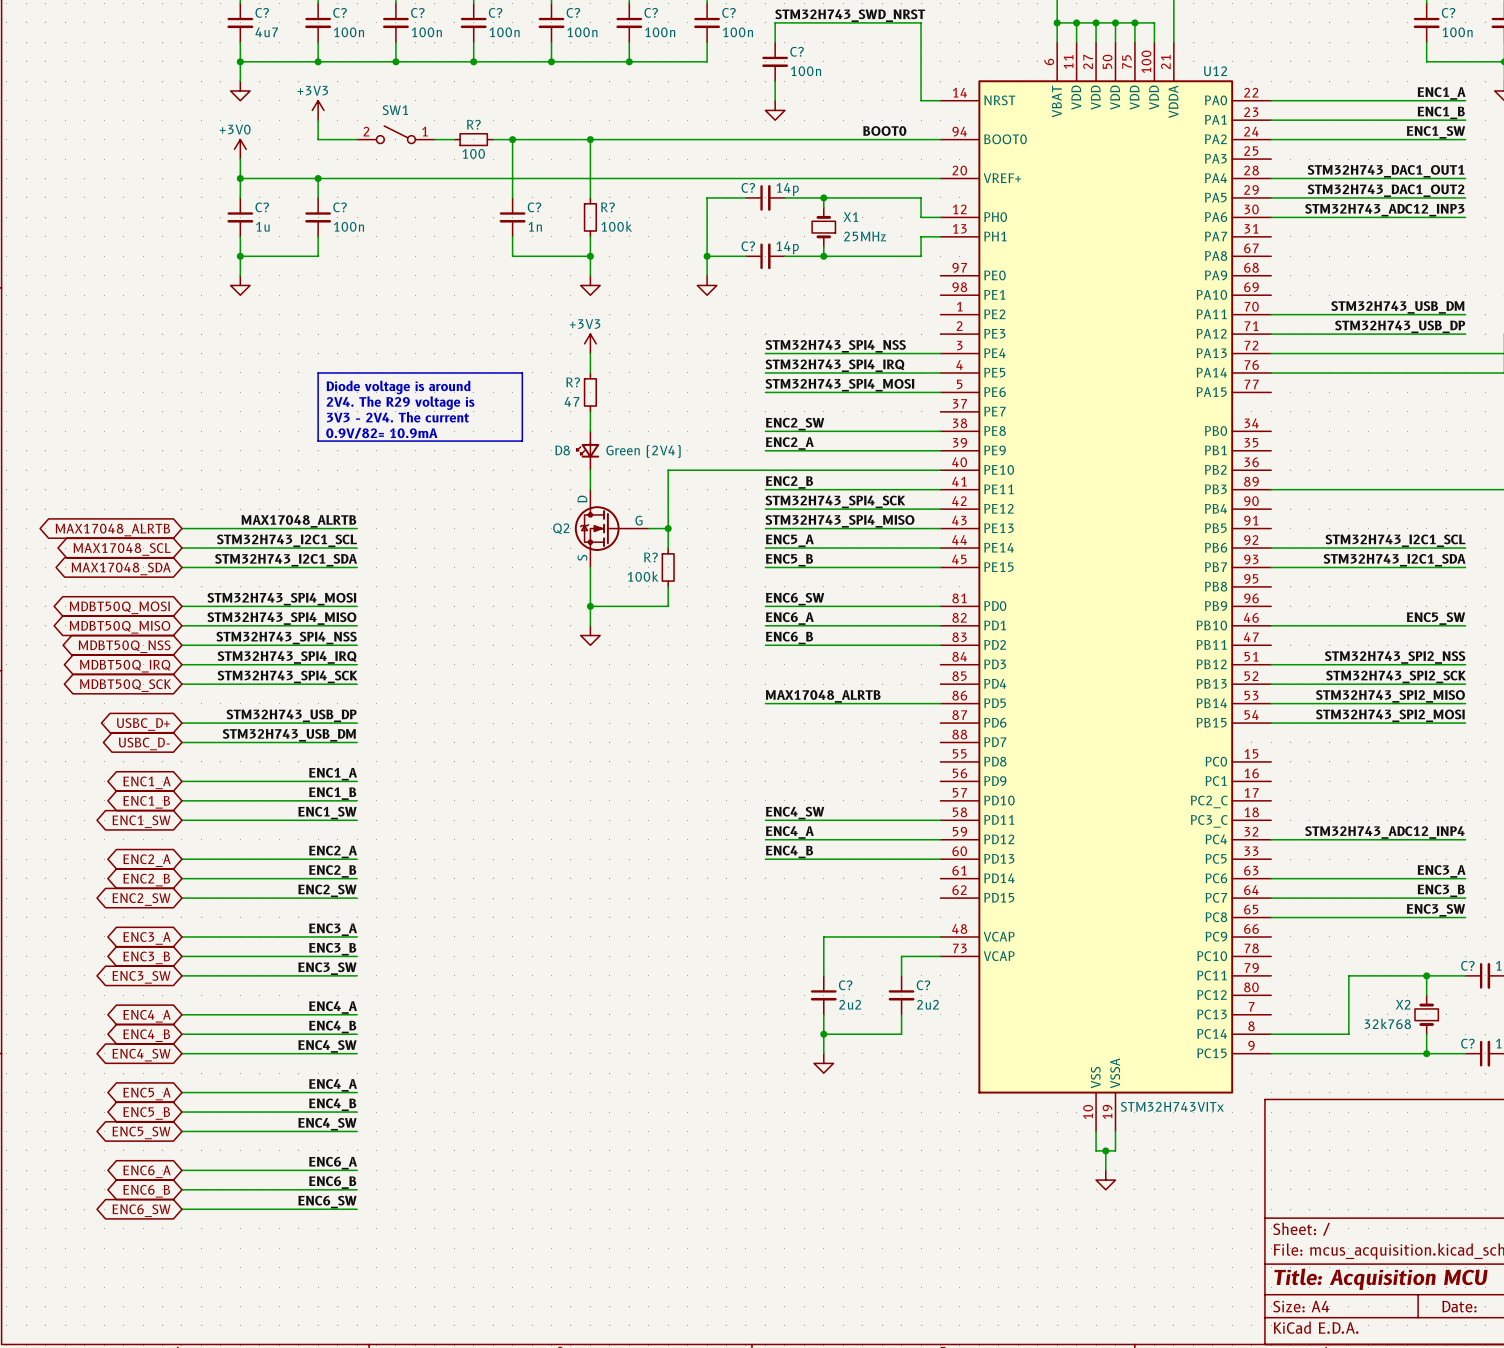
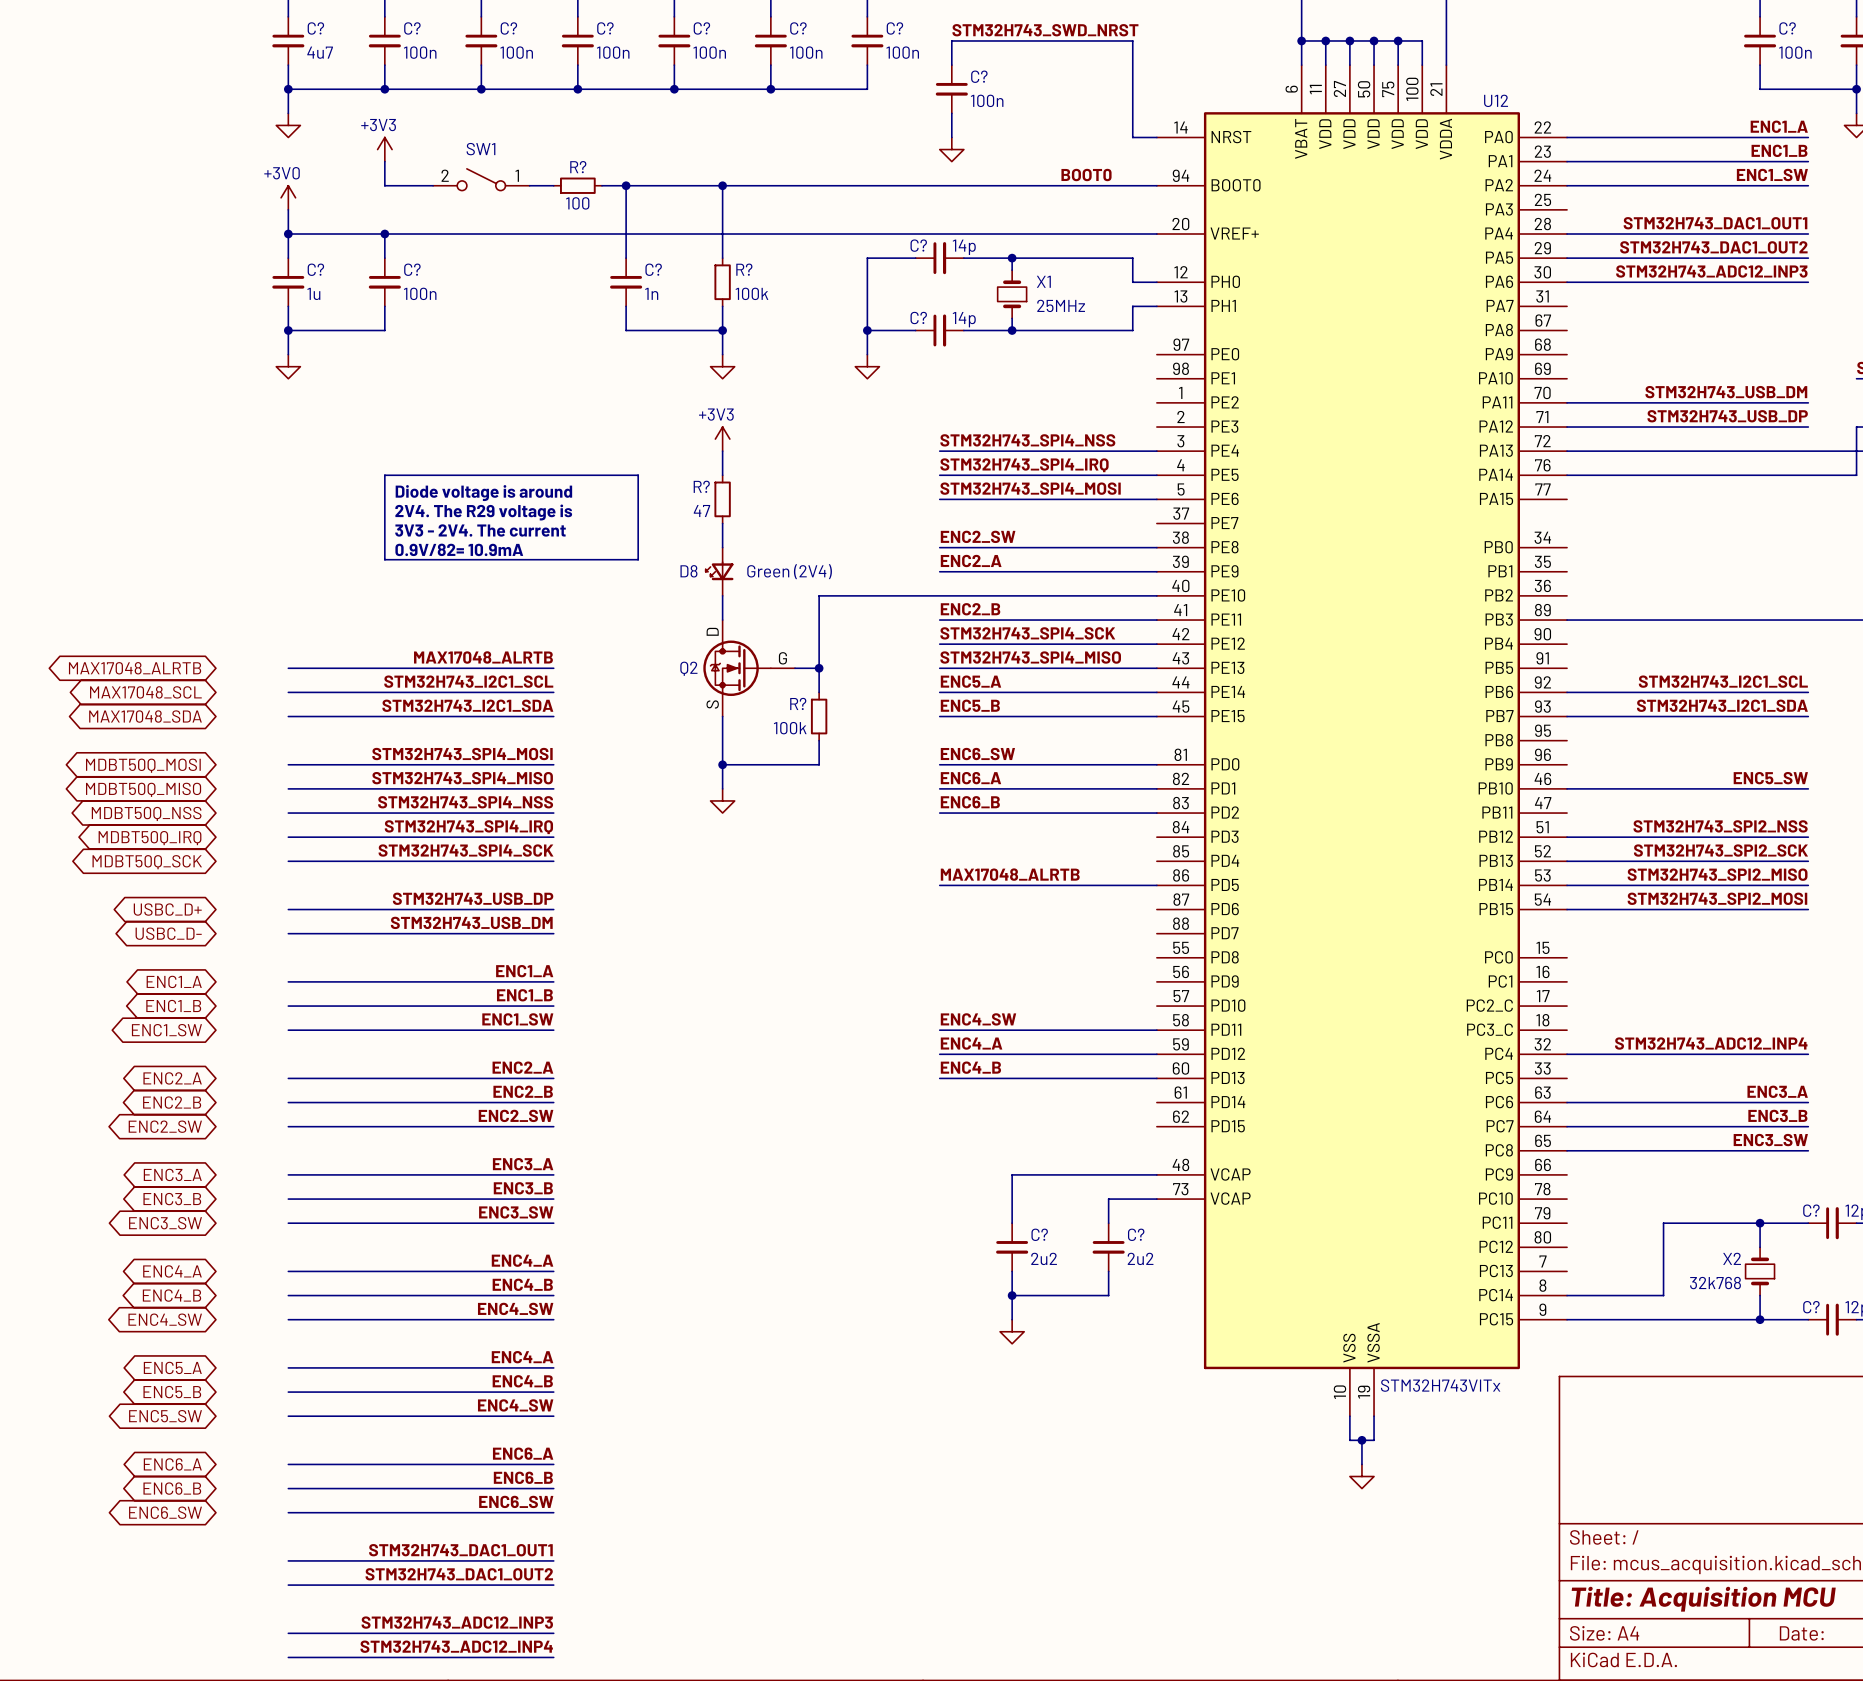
label position: MAX17048_ALRTB (298, 521) -> MAX17048_ALRTB (483, 657)
wire: (181, 528) (240, 528) -> none
wire: none -> (433, 668) (553, 668)
label position: STM32H743_I2C1_SCL (287, 540) -> STM32H743_I2C1_SCL (468, 681)
wire: (181, 548) (240, 548) -> none
wire: none -> (433, 692) (553, 692)
label position: STM32H743_I2C1_SDA (286, 560) -> STM32H743_I2C1_SDA (467, 705)
wire: (181, 567) (240, 567) -> none
wire: none -> (433, 716) (553, 716)
label position: STM32H743_SPI4_MOSI (281, 599) -> STM32H743_SPI4_MOSI (462, 754)
wire: (181, 606) (240, 606) -> none
wire: none -> (433, 764) (553, 764)
label position: STM32H743_SPI4_MISO (281, 618) -> STM32H743_SPI4_MISO (462, 778)
wire: (181, 625) (240, 625) -> none
wire: none -> (433, 788) (553, 788)
label position: STM32H743_SPI4_NSS (286, 638) -> STM32H743_SPI4_NSS (465, 802)
wire: (181, 645) (240, 645) -> none
wire: none -> (433, 813) (553, 813)
label position: STM32H743_SPI4_IRQ (287, 657) -> STM32H743_SPI4_IRQ (468, 827)
wire: (181, 664) (240, 664) -> none
wire: none -> (433, 837) (553, 837)
label position: STM32H743_SPI4_SCK (287, 676) -> STM32H743_SPI4_SCK (466, 850)
wire: (181, 684) (240, 684) -> none
wire: none -> (433, 861) (553, 861)
label position: STM32H743_USB_DP (291, 715) -> STM32H743_USB_DP (473, 898)
wire: (181, 723) (240, 723) -> none
wire: none -> (433, 909) (553, 909)
label position: STM32H743_USB_DM (289, 735) -> STM32H743_USB_DM (471, 922)
wire: (181, 742) (240, 742) -> none
wire: none -> (433, 933) (553, 933)
label position: ENC1_A (333, 774) -> ENC1_A (524, 971)
wire: (181, 781) (240, 781) -> none
wire: none -> (433, 981) (553, 981)
label position: ENC1_B (332, 793) -> ENC1_B (524, 995)
wire: (181, 800) (240, 800) -> none
wire: none -> (433, 1006) (553, 1006)
label position: ENC1_SW (327, 813) -> ENC1_SW (517, 1019)
wire: (181, 820) (240, 820) -> none
wire: none -> (433, 1030) (553, 1030)
label position: ENC2_A (333, 851) -> ENC2_A (522, 1067)
wire: (181, 859) (240, 859) -> none
wire: none -> (433, 1078) (553, 1078)
label position: ENC2_B (332, 871) -> ENC2_B (523, 1091)
wire: (181, 878) (240, 878) -> none
wire: none -> (433, 1102) (553, 1102)
label position: ENC2_SW (327, 890) -> ENC2_SW (516, 1115)
wire: (181, 898) (240, 898) -> none
wire: none -> (433, 1126) (553, 1126)
label position: ENC3_A (333, 929) -> ENC3_A (523, 1164)
wire: (181, 936) (240, 936) -> none
wire: none -> (433, 1174) (553, 1174)
label position: ENC3_B (332, 949) -> ENC3_B (523, 1188)
wire: (181, 956) (240, 956) -> none
wire: none -> (433, 1199) (553, 1199)
label position: ENC3_SW (327, 968) -> ENC3_SW (516, 1212)
wire: (181, 975) (240, 975) -> none
wire: none -> (433, 1223) (553, 1223)
label: ENC4_A (333, 1007) -> none
label: none -> ENC4_A (522, 1260)
wire: (181, 1014) (240, 1014) -> none
wire: none -> (433, 1271) (553, 1271)
label: ENC4_B (332, 1027) -> none
label: none -> ENC4_B (522, 1284)
wire: (181, 1034) (240, 1034) -> none
wire: none -> (433, 1295) (553, 1295)
label: ENC4_SW (327, 1046) -> none
label: none -> ENC4_SW (515, 1308)
wire: (181, 1053) (240, 1053) -> none
wire: none -> (433, 1319) (553, 1319)
label: ENC4_A (333, 1085) -> none
label: none -> ENC4_A (522, 1357)
wire: (181, 1092) (240, 1092) -> none
wire: none -> (433, 1367) (553, 1367)
label: ENC4_B (332, 1104) -> none
label: none -> ENC4_B (522, 1381)
wire: (181, 1112) (240, 1112) -> none
wire: none -> (433, 1392) (553, 1392)
label: ENC4_SW (327, 1124) -> none
label: none -> ENC4_SW (515, 1405)
wire: (181, 1131) (240, 1131) -> none
wire: none -> (433, 1416) (553, 1416)
label position: ENC6_A (333, 1163) -> ENC6_A (523, 1453)
wire: (181, 1170) (240, 1170) -> none
wire: none -> (433, 1464) (553, 1464)
label position: ENC6_B (332, 1182) -> ENC6_B (523, 1477)
wire: (181, 1189) (240, 1189) -> none
wire: none -> (433, 1488) (553, 1488)
label position: ENC6_SW (327, 1202) -> ENC6_SW (516, 1501)
wire: (181, 1209) (240, 1209) -> none
wire: none -> (433, 1512) (553, 1512)
label: none -> STM32H743_DAC1_OUT1 (460, 1550)
wire: none -> (288, 1560) (553, 1560)
label: none -> STM32H743_DAC1_OUT2 (459, 1574)
wire: none -> (288, 1585) (553, 1585)
label: none -> STM32H743_ADC12_INP3 (457, 1622)
wire: none -> (288, 1633) (553, 1633)
label: none -> STM32H743_ADC12_INP4 (456, 1646)
wire: none -> (288, 1657) (553, 1657)

